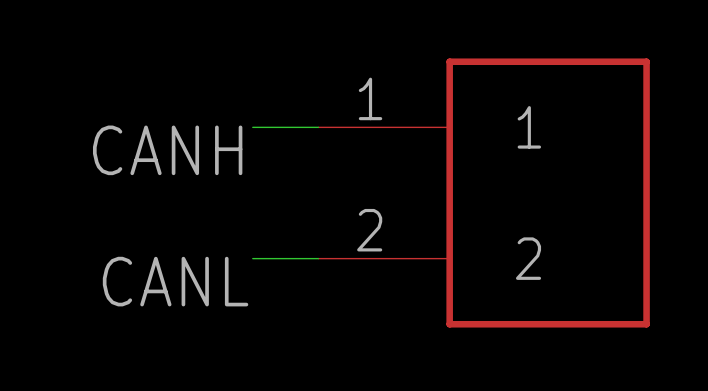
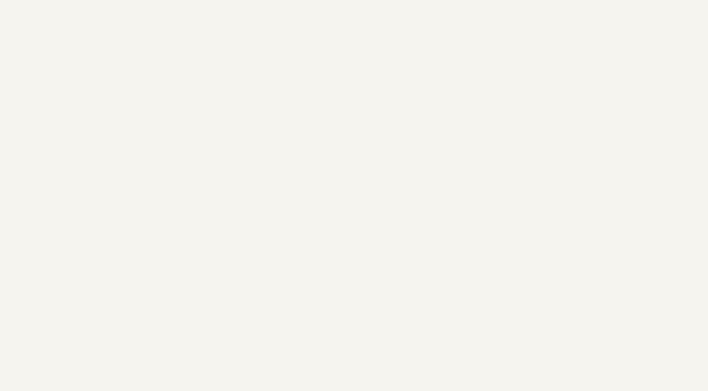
wire: (252, 127) (318, 127) -> none
label: CANH (167, 150) -> none
part: (484, 192) -> none
wire: (252, 258) (318, 258) -> none
label: CANL (175, 281) -> none

